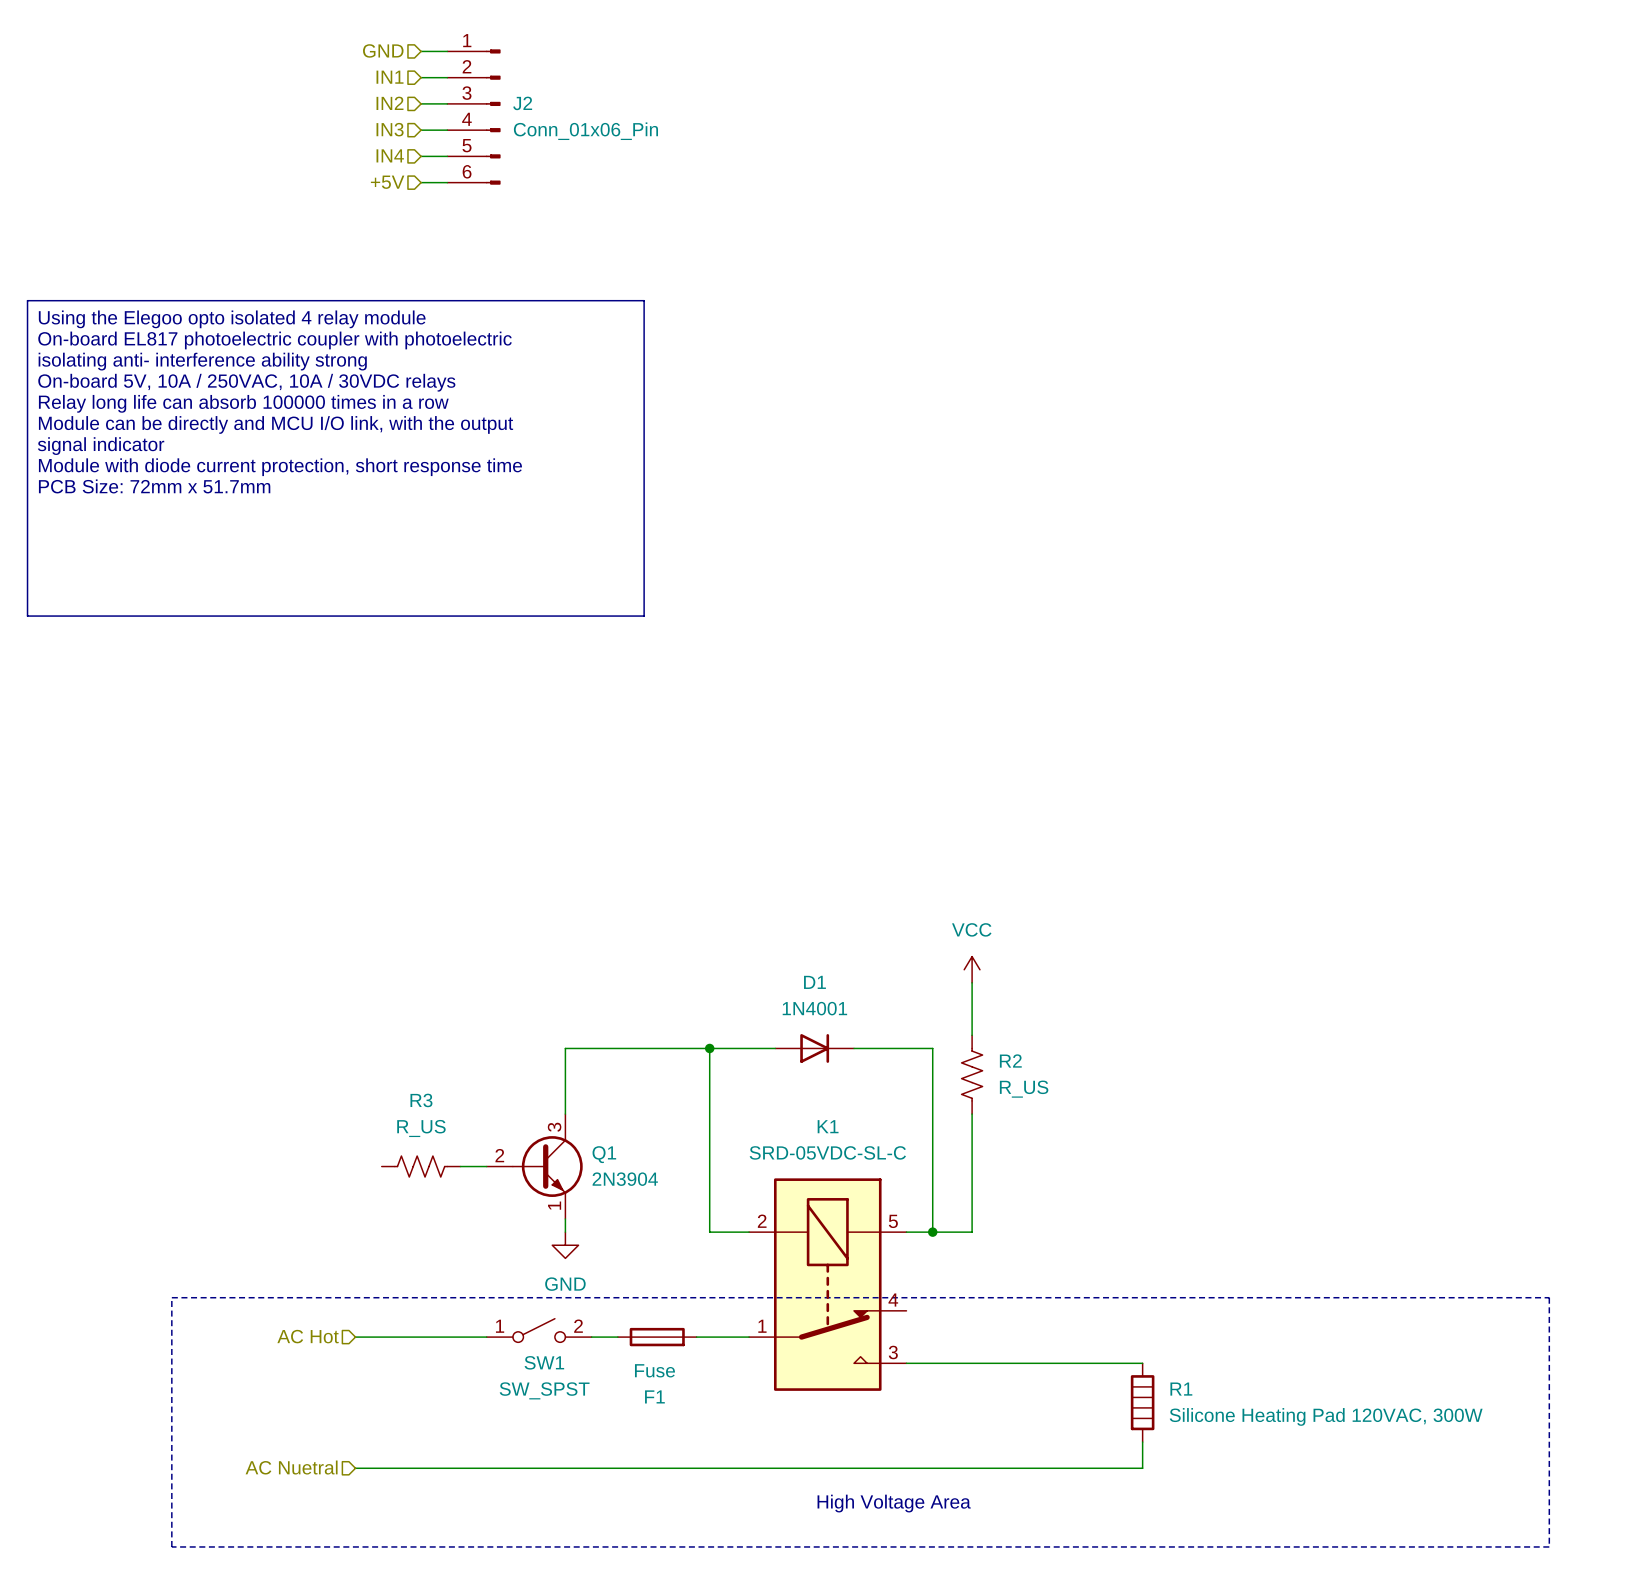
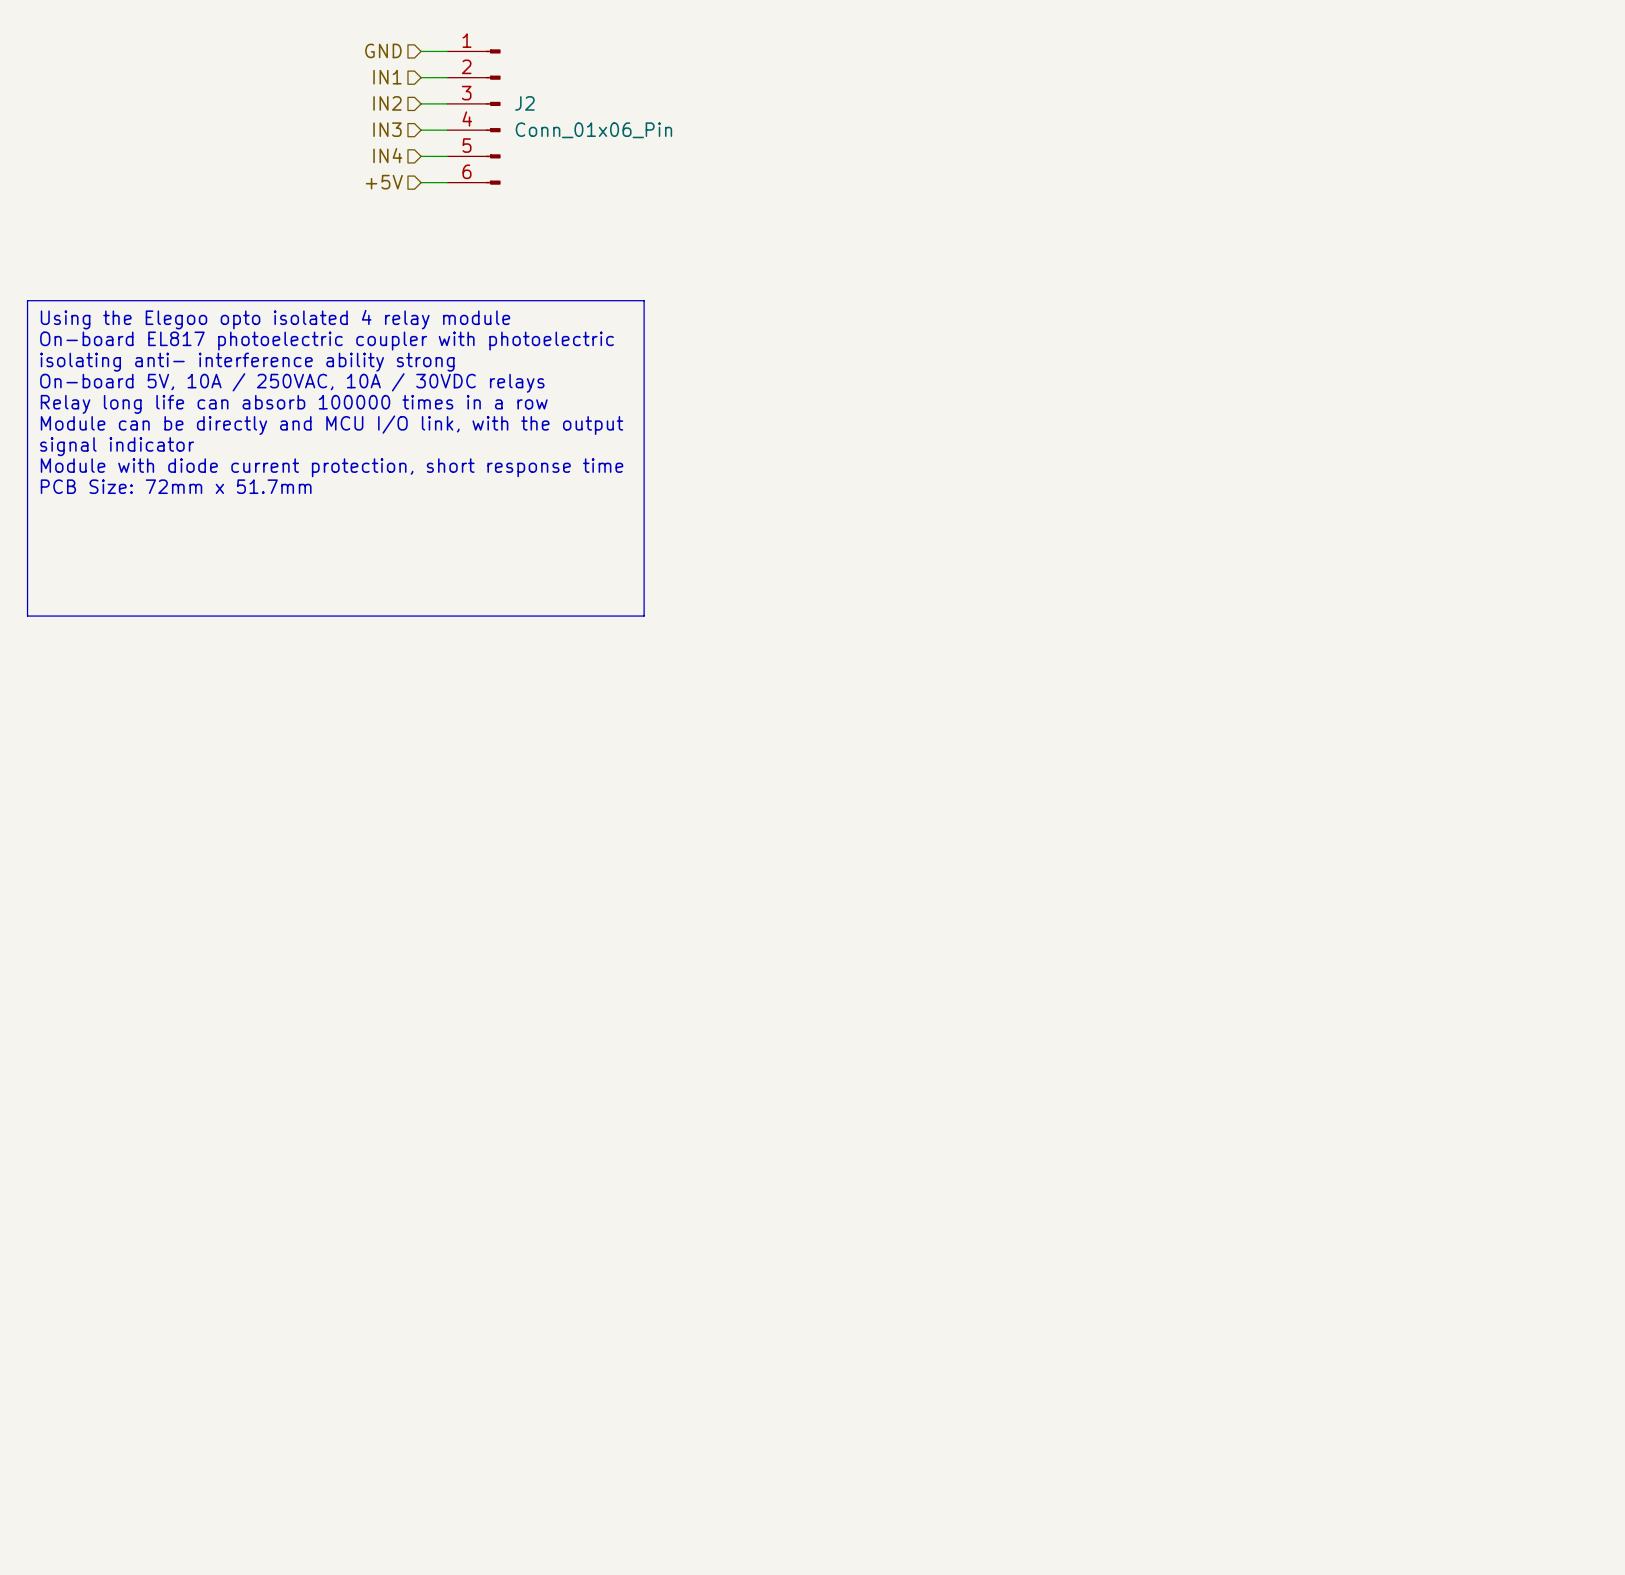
power symbol: VCC (972, 969) -> none
wire: (972, 982) (972, 1035) -> none
wire: (709, 1048) (709, 1232) (749, 1232) -> none
junction: (709, 1048) -> none
wire: (775, 1048) (565, 1048) (565, 1114) -> none
D1: 1N4001 (814, 1048) -> none
wire: (854, 1048) (932, 1048) (932, 1232) -> none
R2: R_US (972, 1074) -> none
wire: (972, 1114) (972, 1232) (906, 1232) -> none
R3: R_US (421, 1166) -> none
wire: (460, 1166) (486, 1166) -> none
Q1: 2N3904 (534, 1166) -> none
wire: (565, 1219) (565, 1232) -> none
junction: (932, 1232) -> none
power symbol: GND (565, 1245) -> none
K1: SRD-05VDC-SL-C (827, 1284) -> none
line: (171, 1297) (1549, 1297) (1549, 1546) (171, 1546) (171, 1297) -> none
SW1: SW_SPST (539, 1330) -> none
hierarchical label: AC Hot (308, 1336) -> none
wire: (355, 1337) (486, 1337) -> none
wire: (591, 1337) (617, 1337) -> none
F1: Fuse (657, 1337) -> none
wire: (696, 1337) (749, 1337) -> none
wire: (906, 1363) (1142, 1363) -> none
R1: Silicone Heating Pad 120VAC, 300W (1142, 1402) -> none
wire: (1142, 1442) (1142, 1468) (355, 1468) -> none
hierarchical label: AC Nuetral (291, 1467) -> none
text: High Voltage Area (894, 1503) -> none

